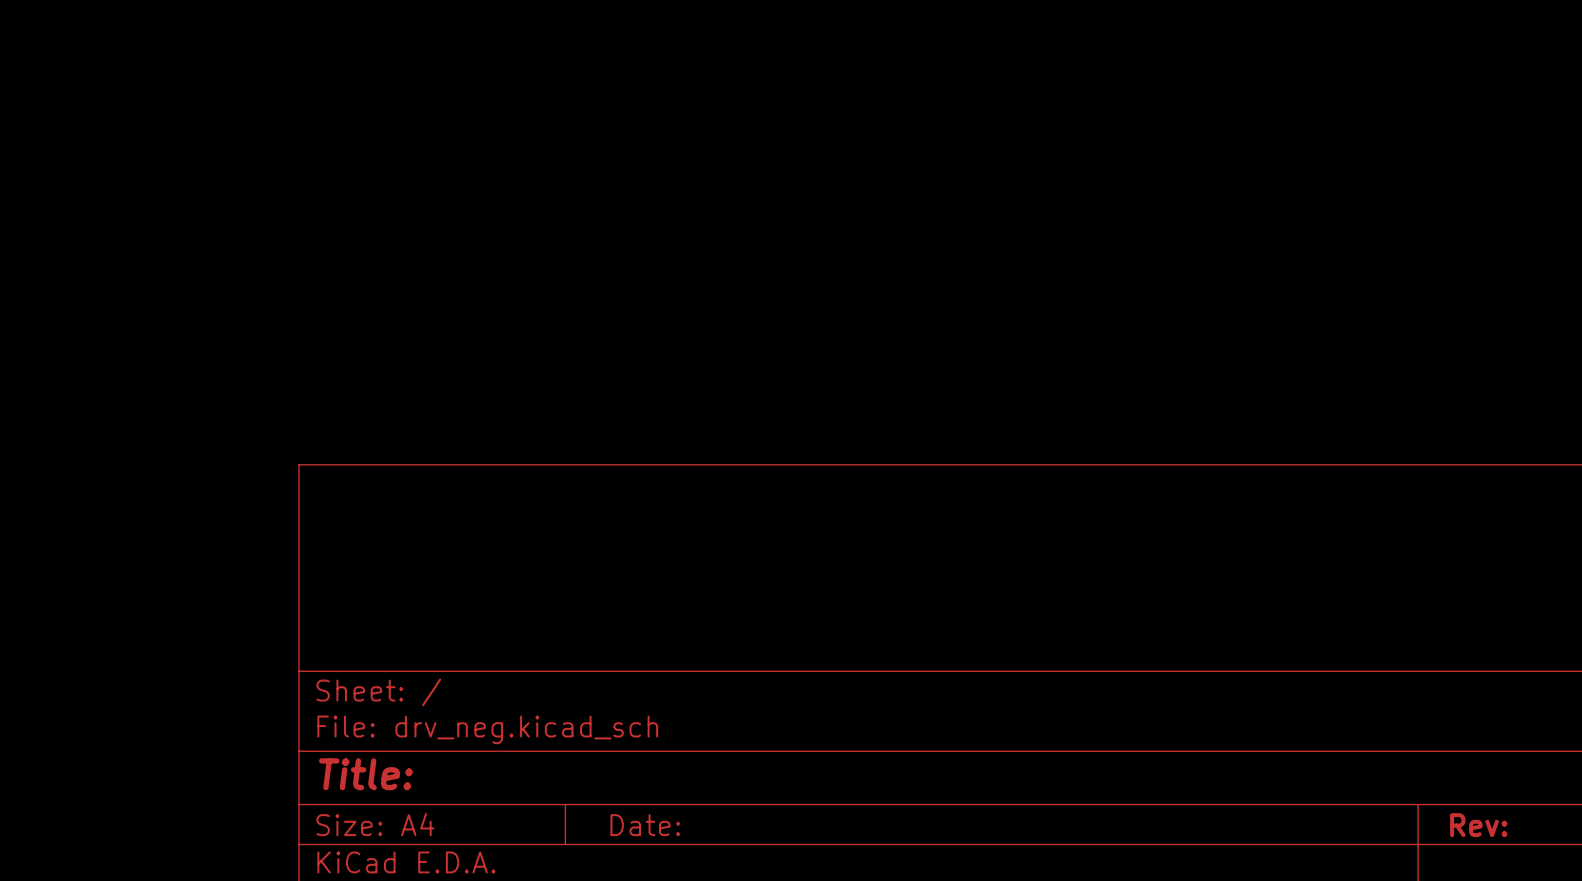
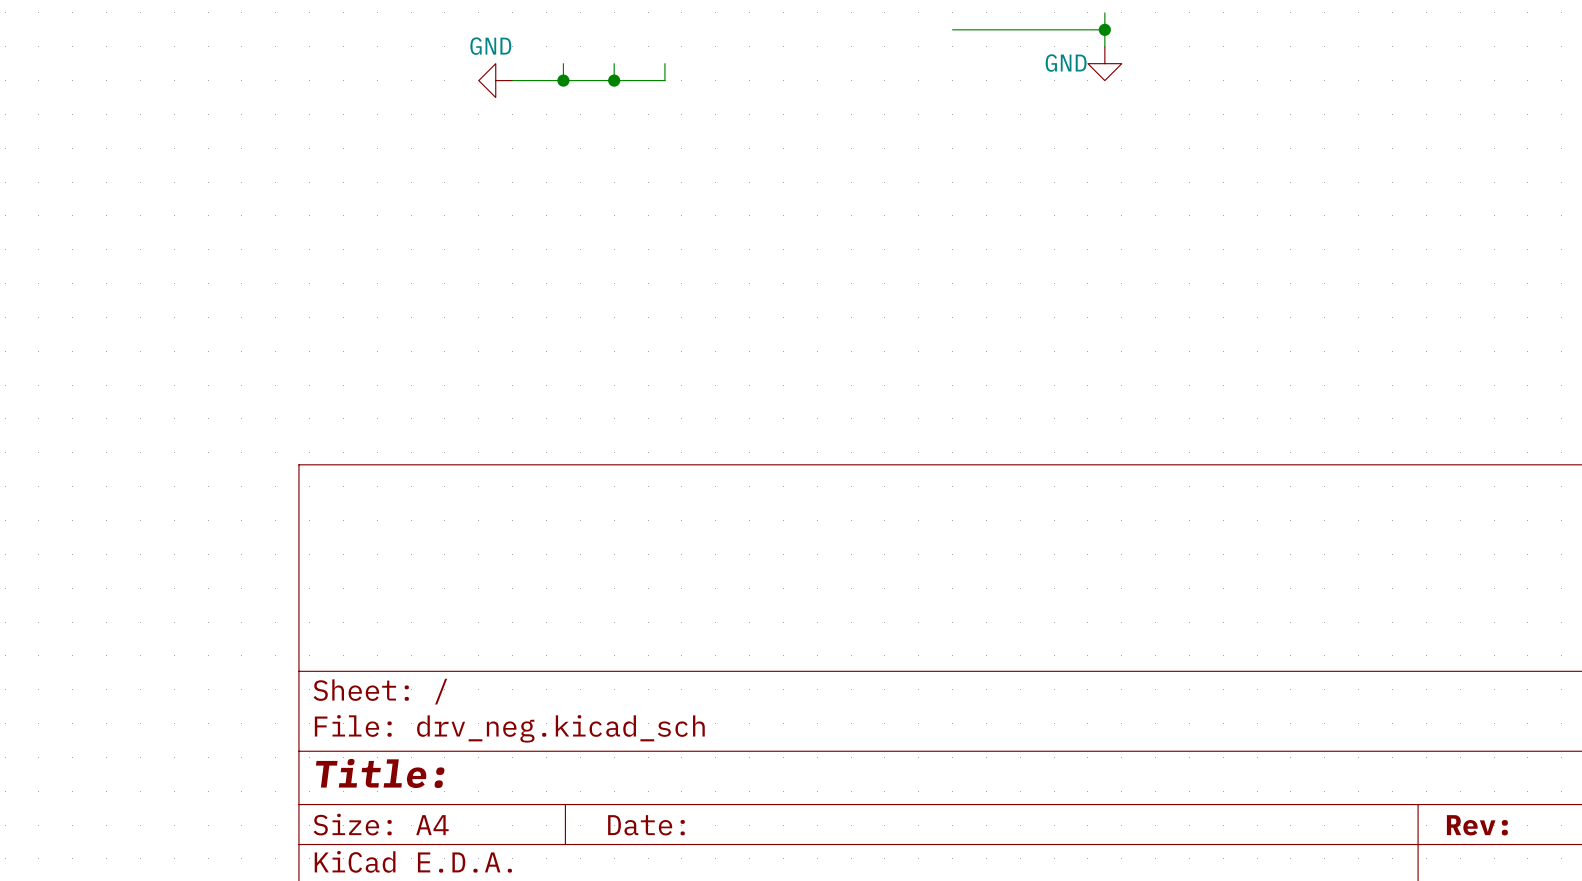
wire: none -> (1104, 12) (1104, 46)
wire: none -> (952, 29) (1104, 29)
junction: none -> (1104, 29)
wire: none -> (563, 63) (563, 80)
wire: none -> (614, 63) (614, 80)
wire: none -> (664, 63) (664, 80) (512, 80)
power symbol: none -> GND (1104, 63)
power symbol: none -> GND (495, 80)
junction: none -> (563, 80)
junction: none -> (614, 80)

